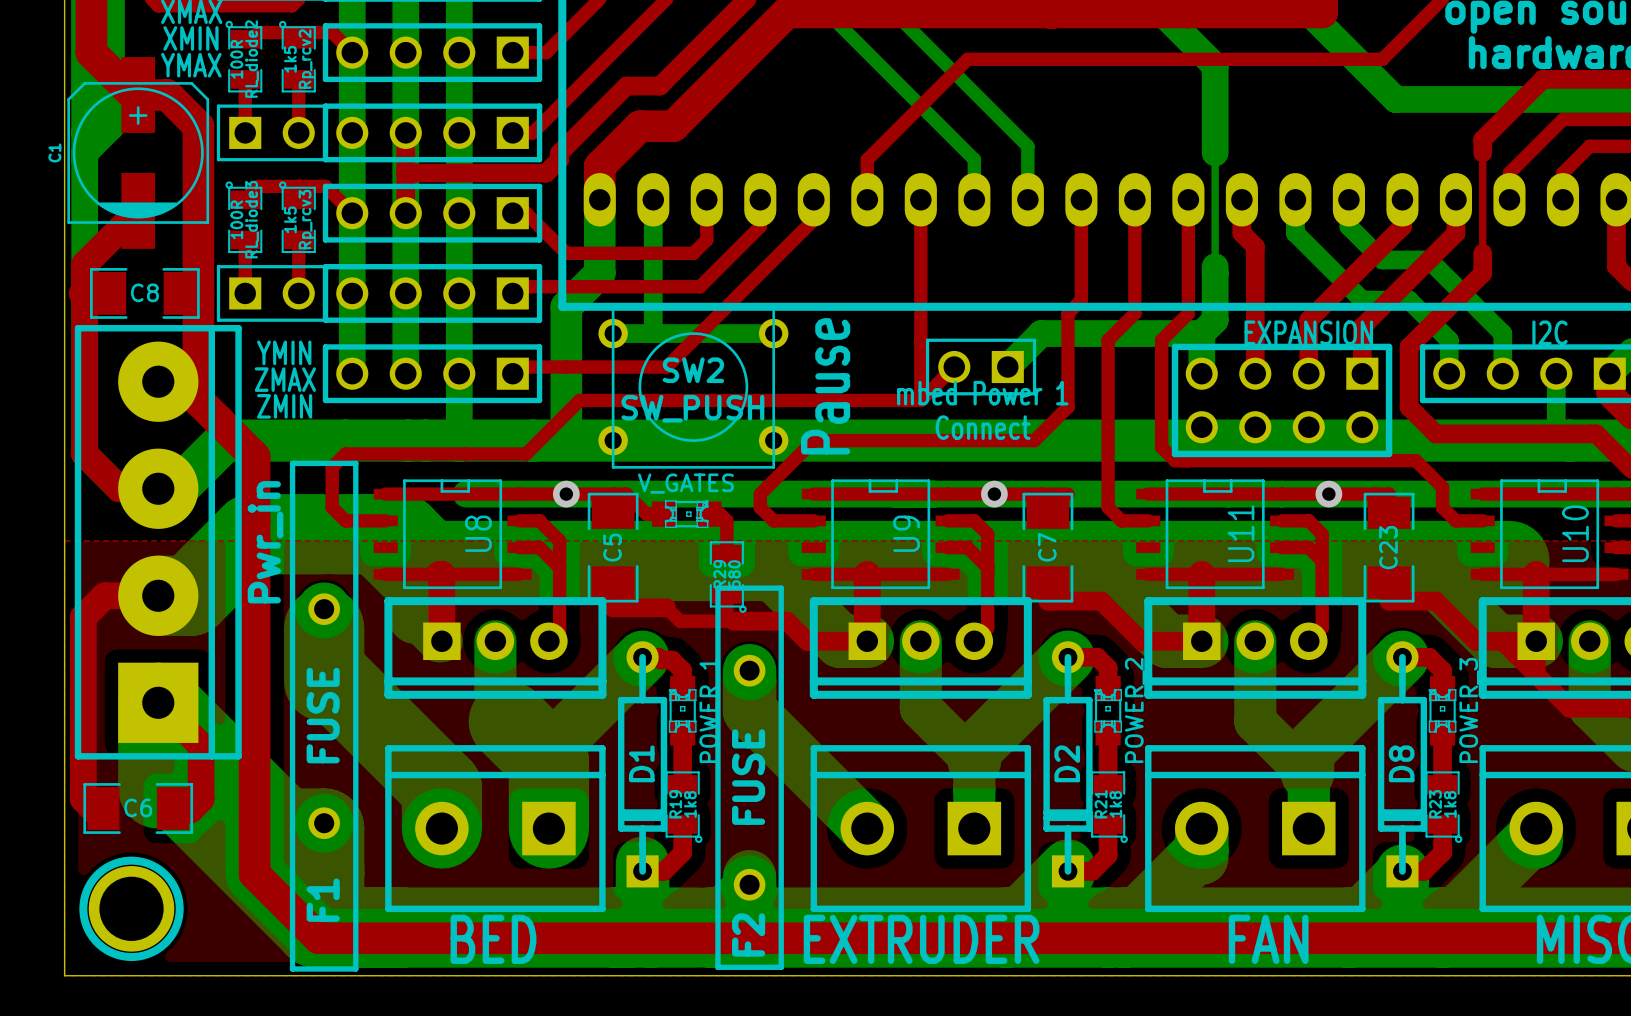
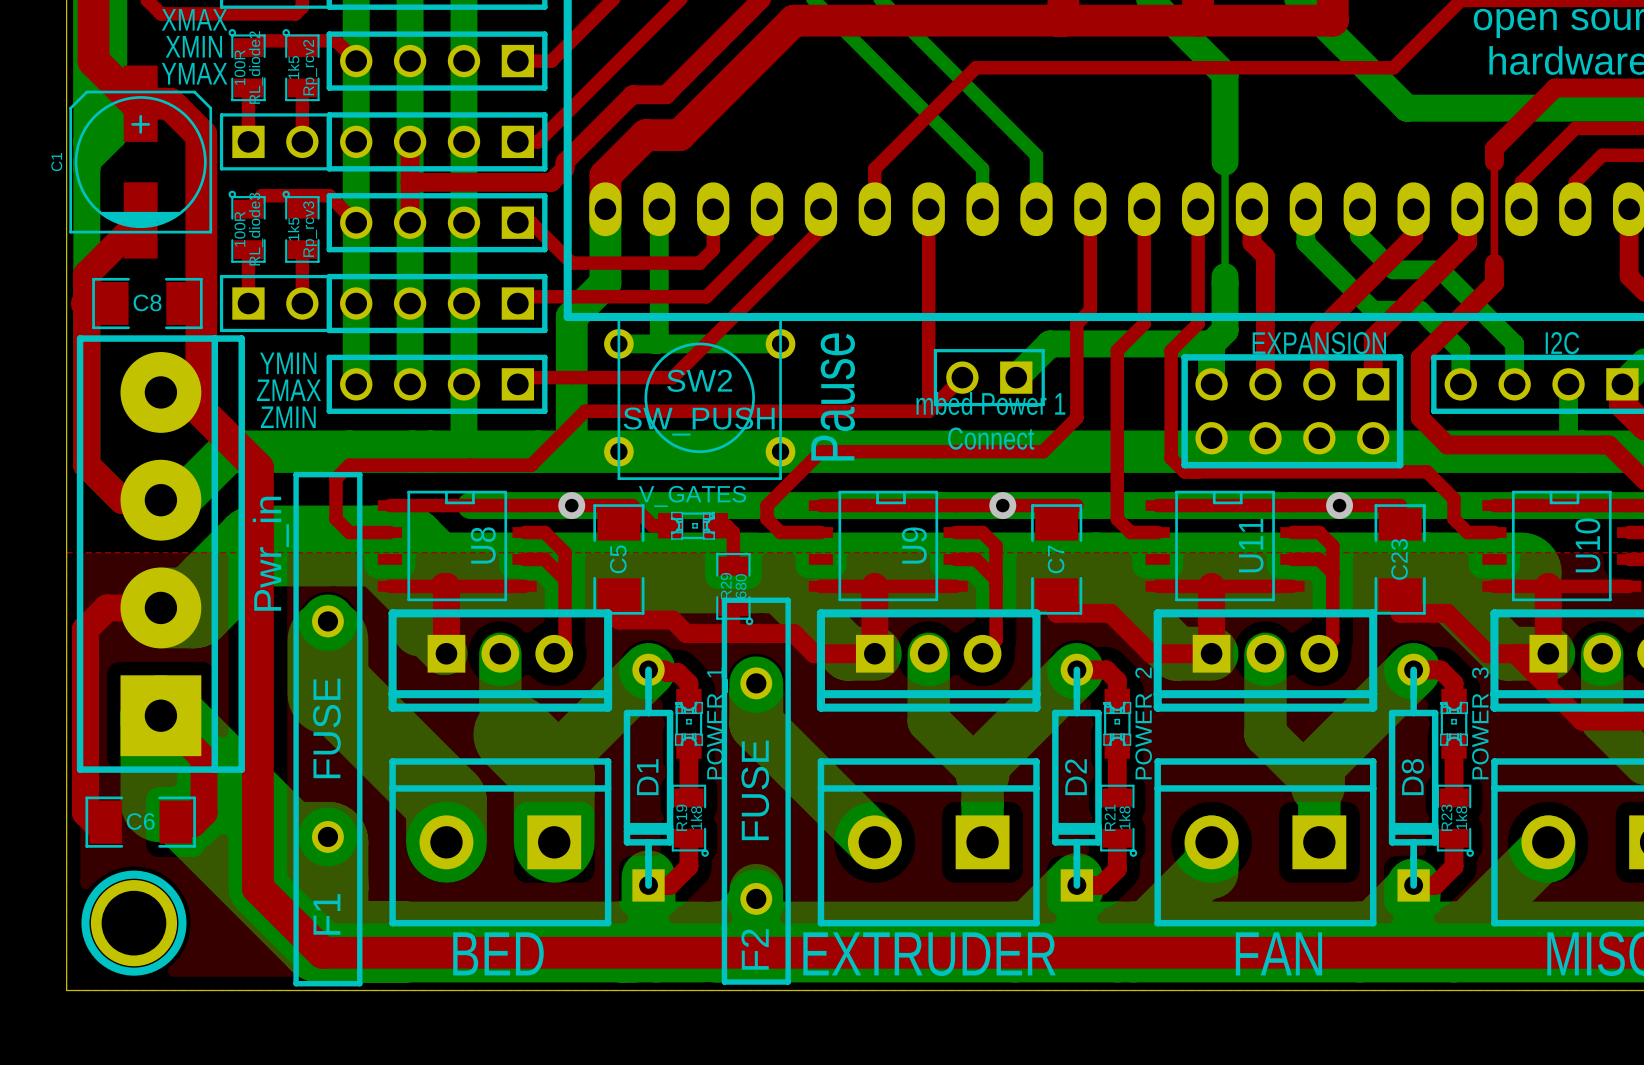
top track width: thin (666, 607) (680, 621) (733, 621) -> thick (672, 620) (686, 633) (740, 633)

